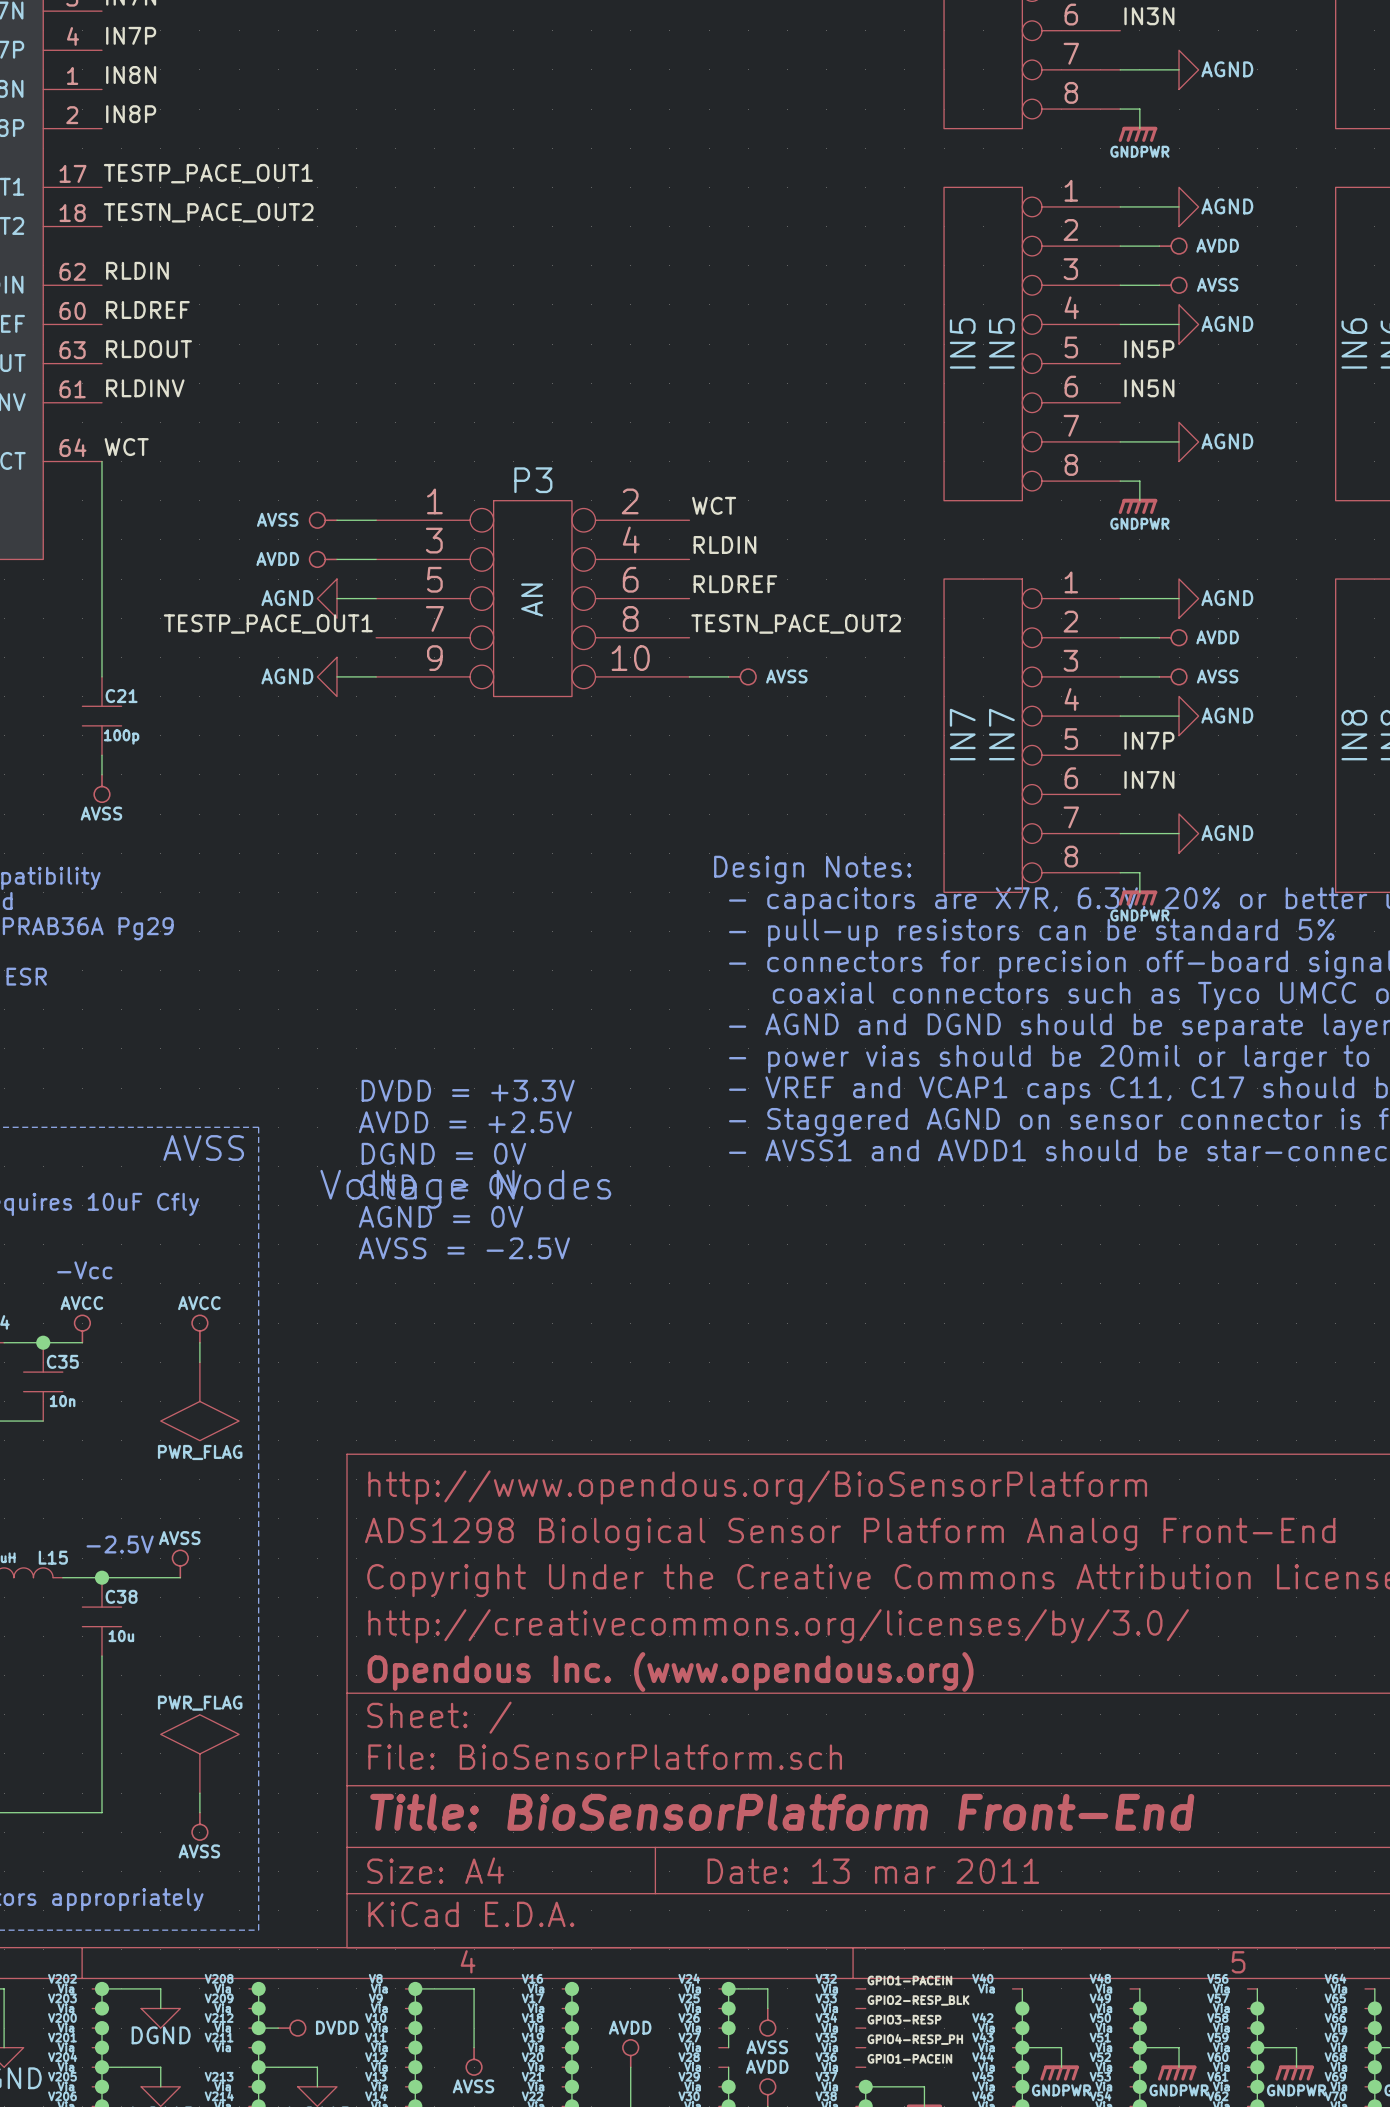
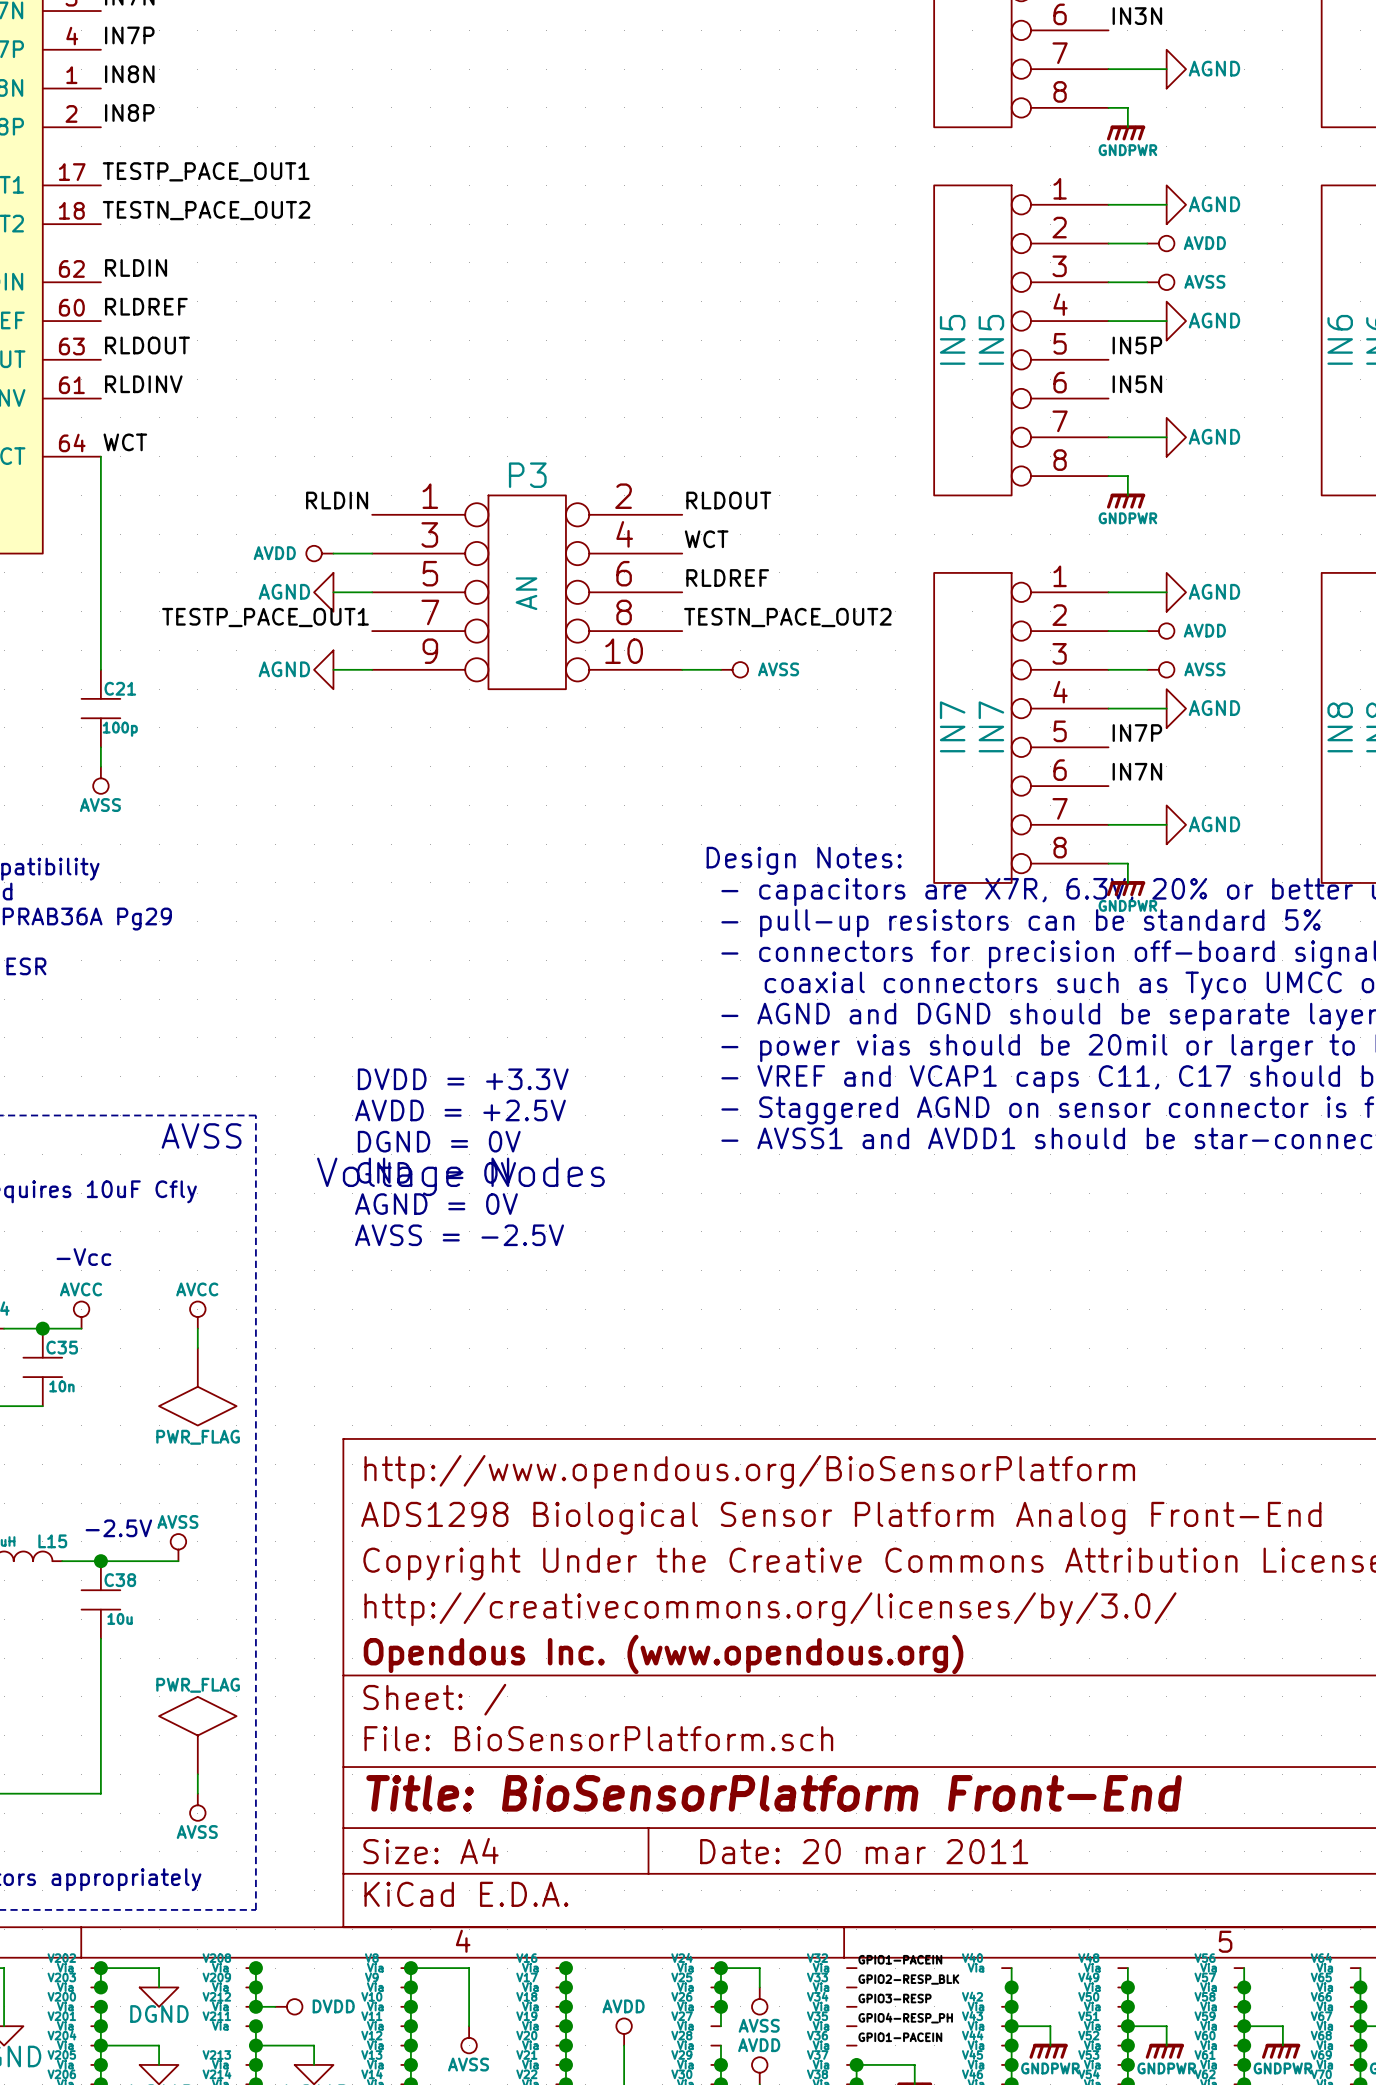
label: none -> RLDIN (337, 500)
label: WCT (714, 505) -> RLDOUT (728, 500)
power symbol: AVSS (323, 520) -> none
wire: (336, 520) (376, 520) -> none
label: RLDIN (724, 544) -> WCT (706, 539)
title block: Date: 13 mar 2011 (873, 1871) -> Date: 20 mar 2011 (864, 1851)

